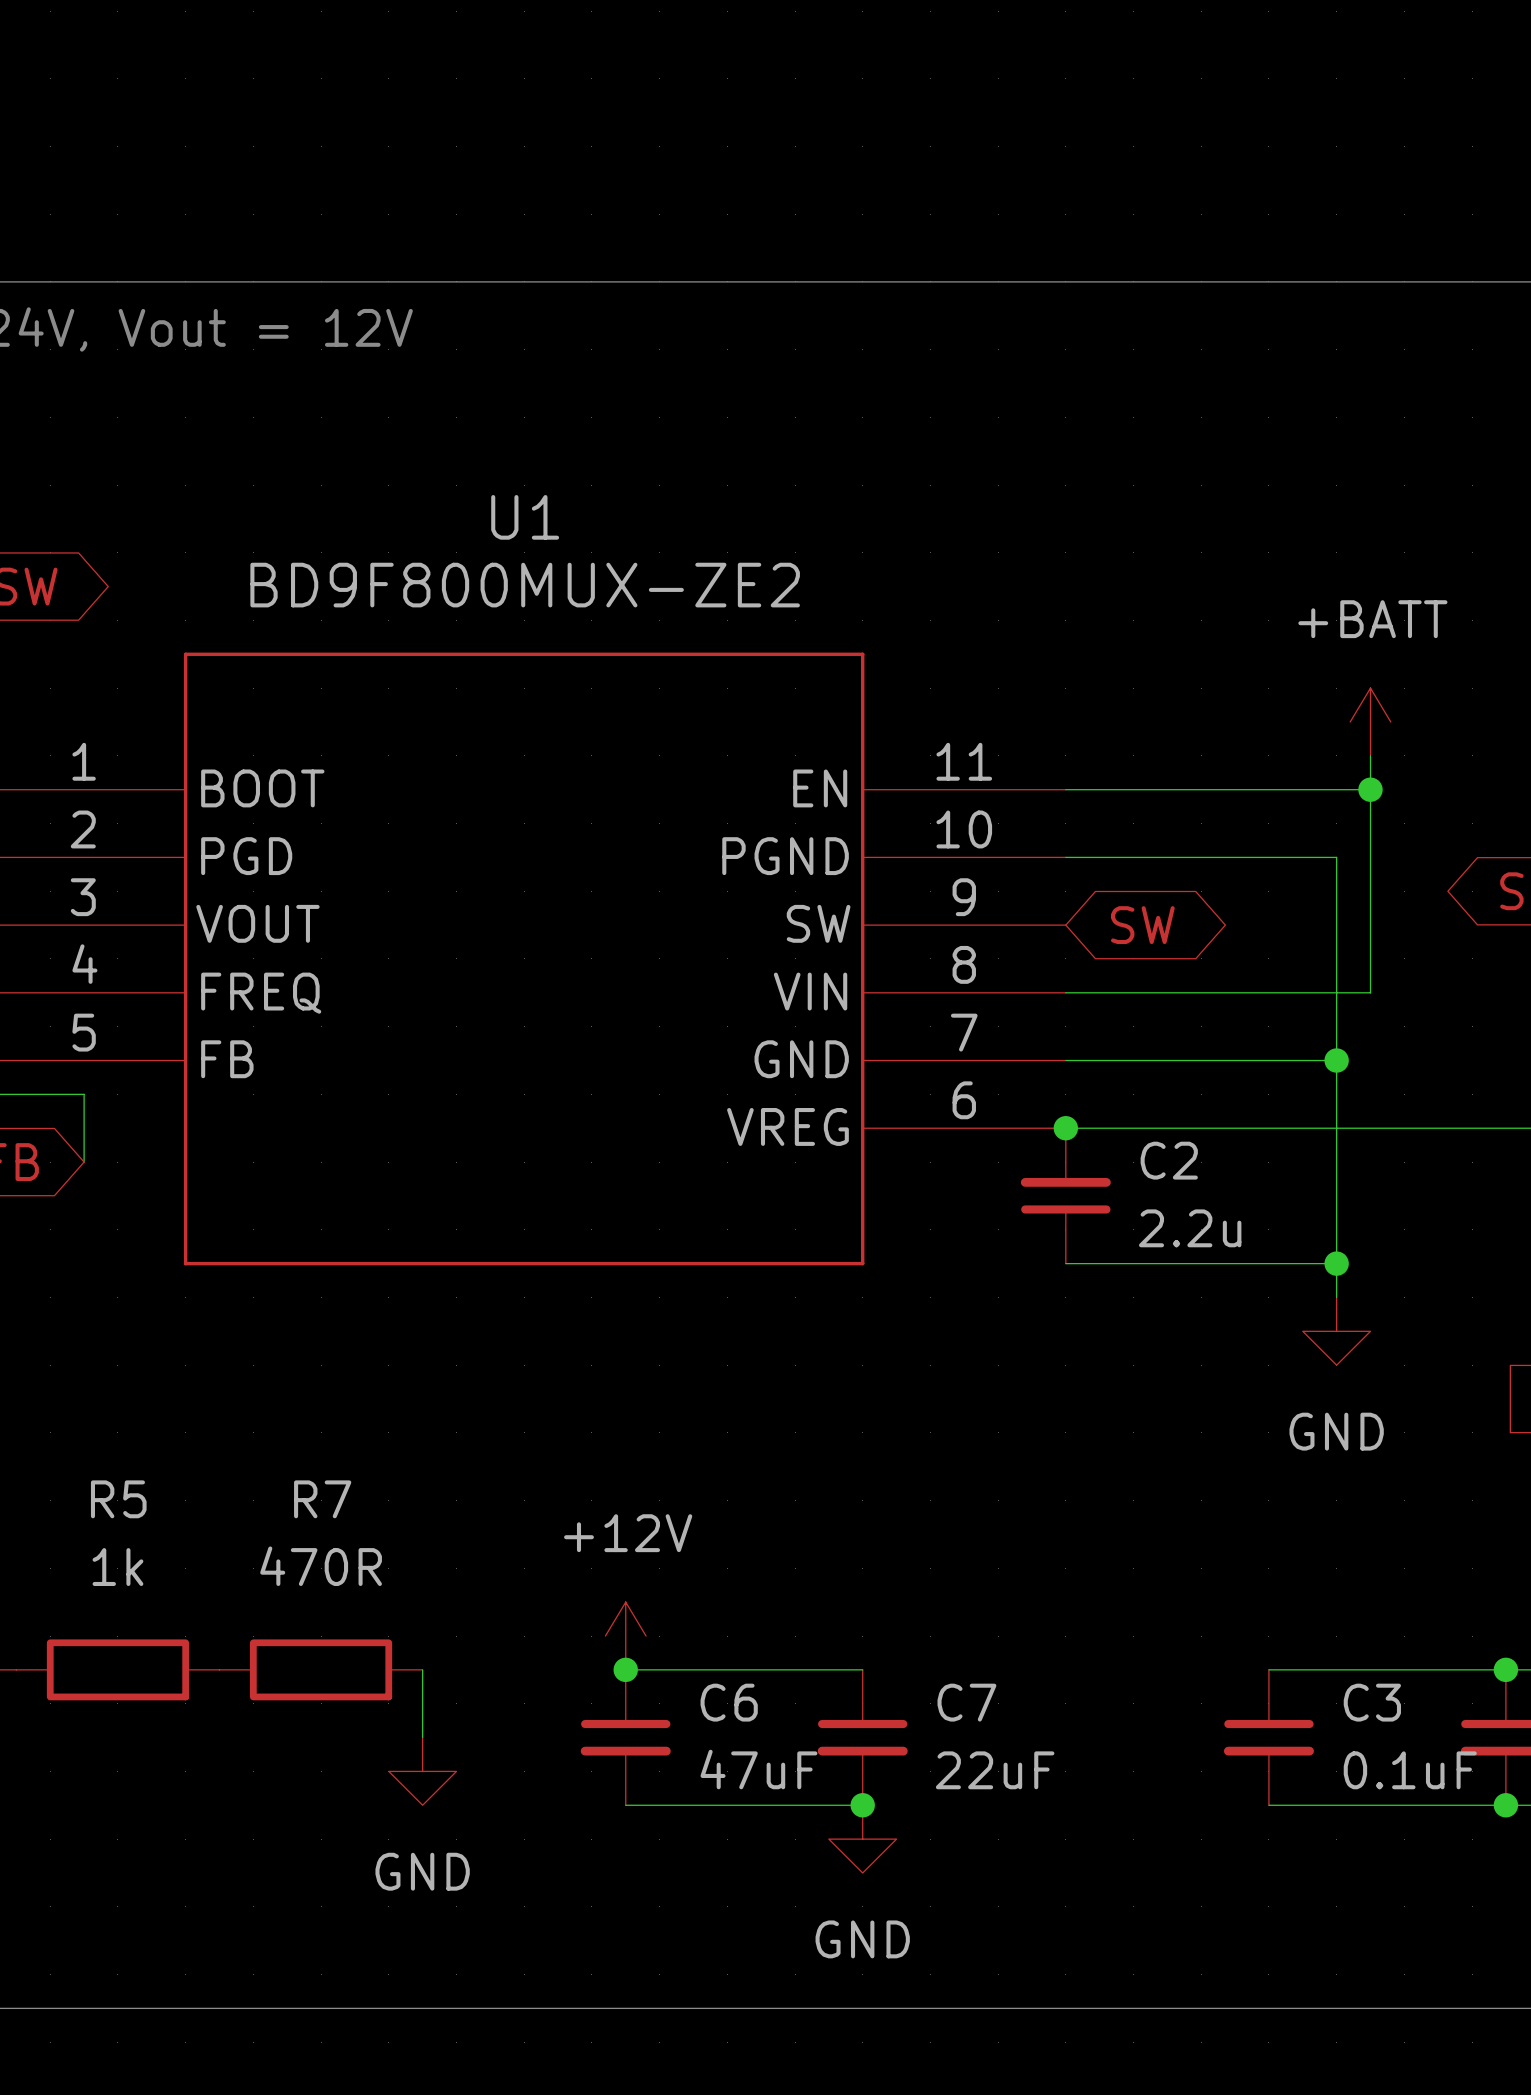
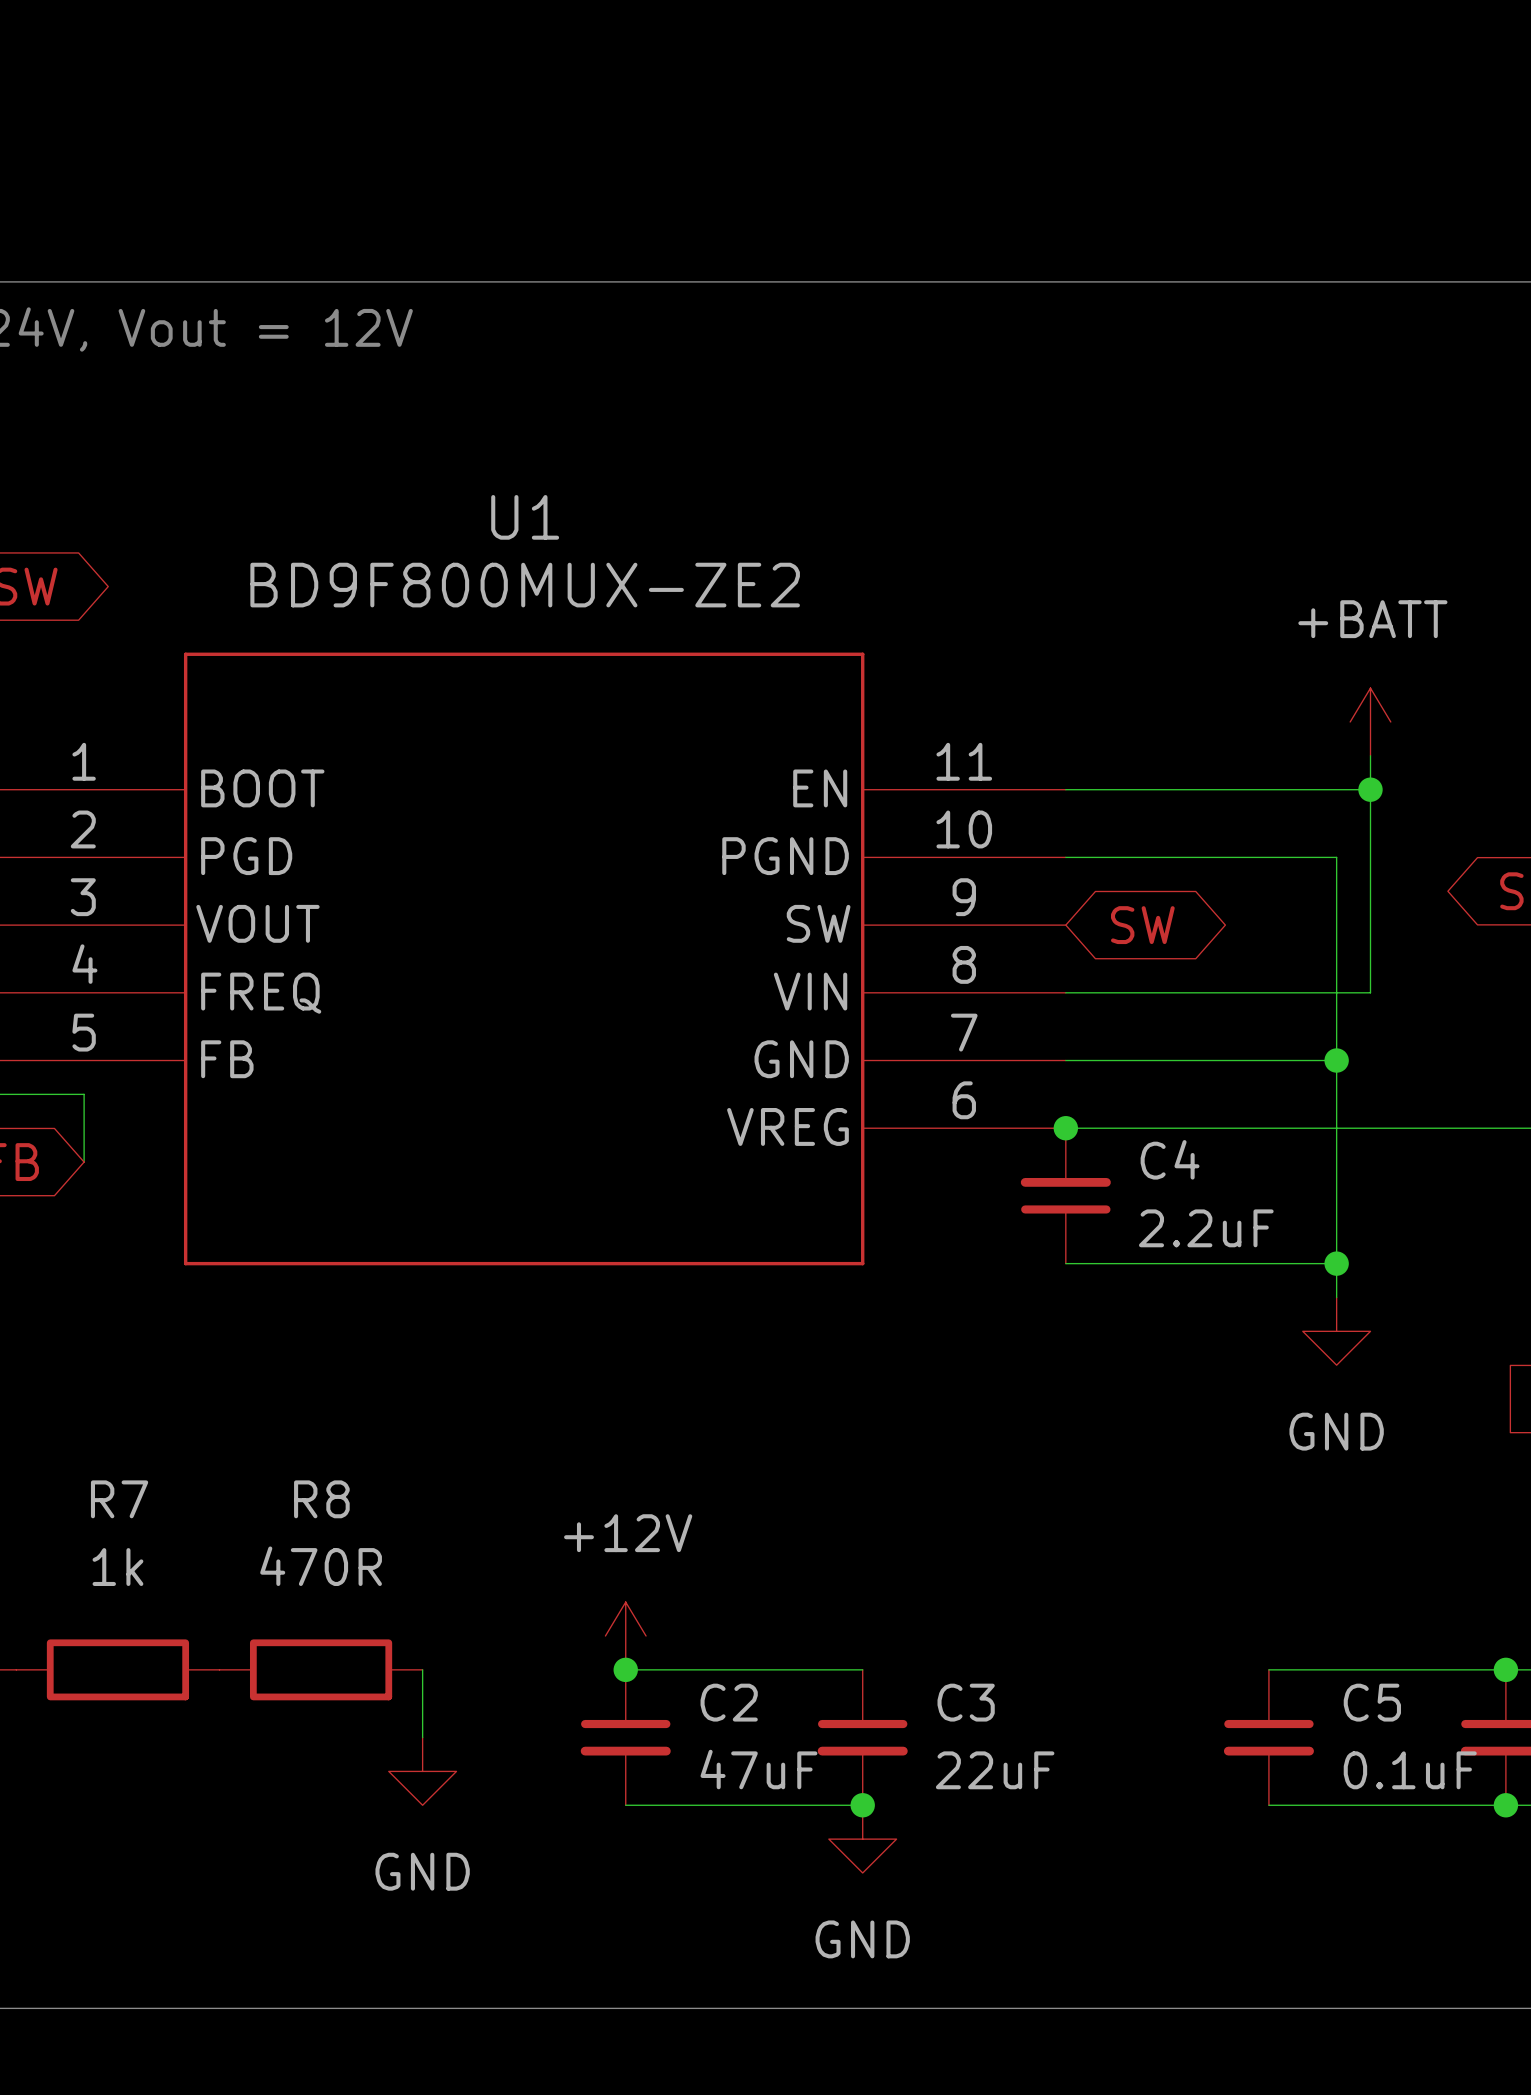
C2 name: C2 (1169, 1160) -> C4 (1170, 1159)
C2 value: 2.2u (1190, 1228) -> 2.2uF (1206, 1228)
R5 name: R5 (118, 1499) -> R7 (119, 1499)
R7 name: R7 (322, 1499) -> R8 (321, 1499)
C6 name: C6 (729, 1702) -> C2 (729, 1702)
C7 name: C7 (966, 1702) -> C3 (966, 1702)
C3 name: C3 (1372, 1702) -> C5 (1372, 1702)

